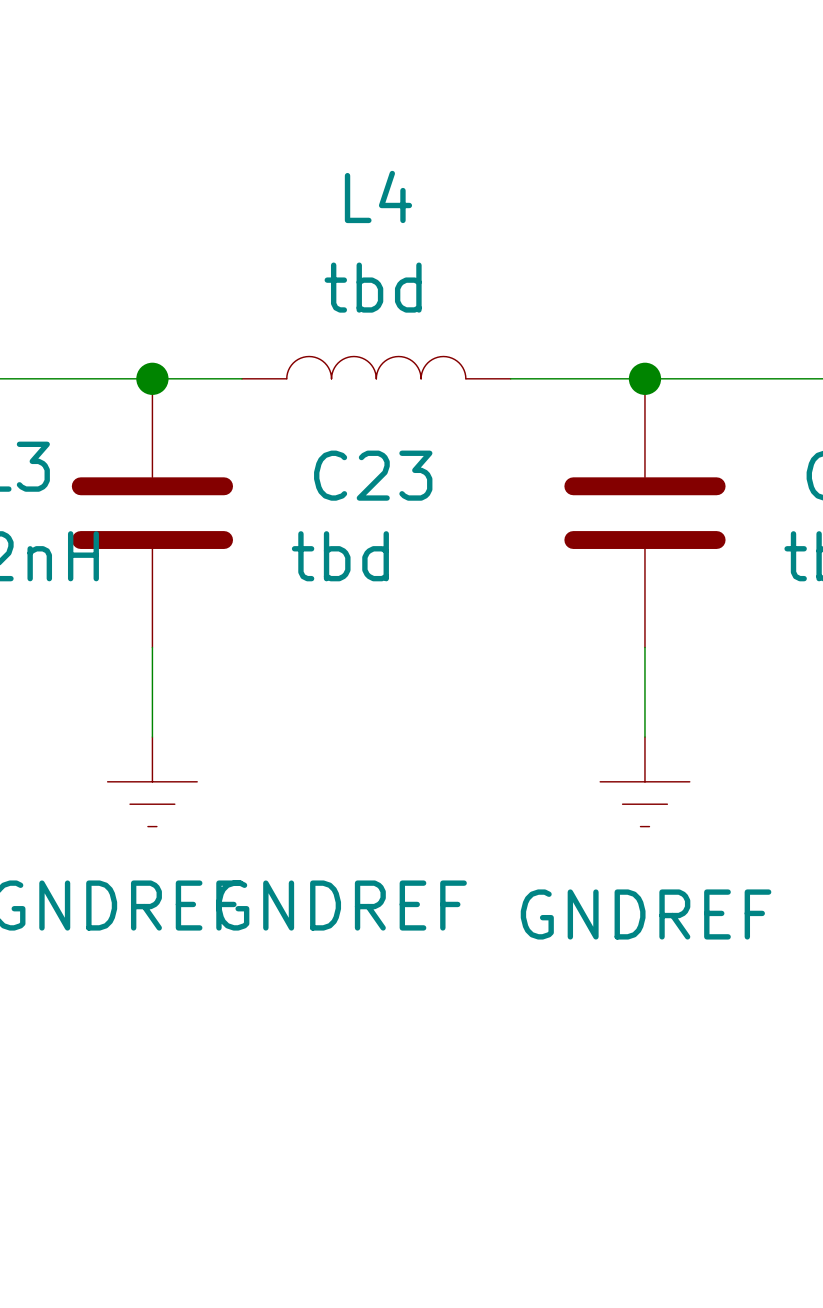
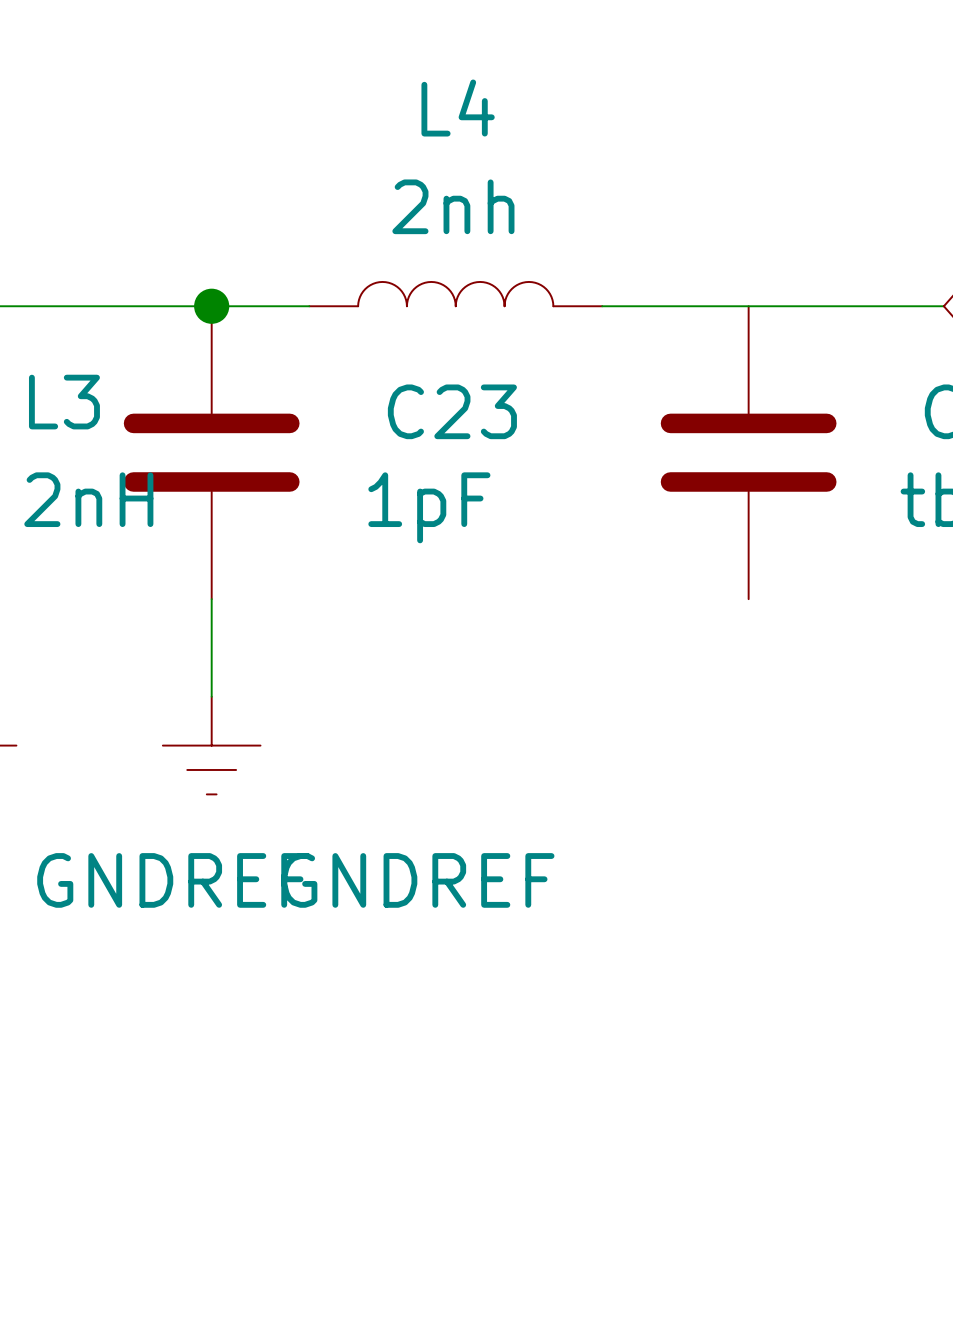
L4 value: tbd (373, 287) -> 2nh (453, 206)
junction: (644, 378) -> none
C23 value: tbd (340, 556) -> 1pF (429, 507)
wire: (644, 647) (644, 737) -> none
power symbol: GNDREF (644, 781) -> none

